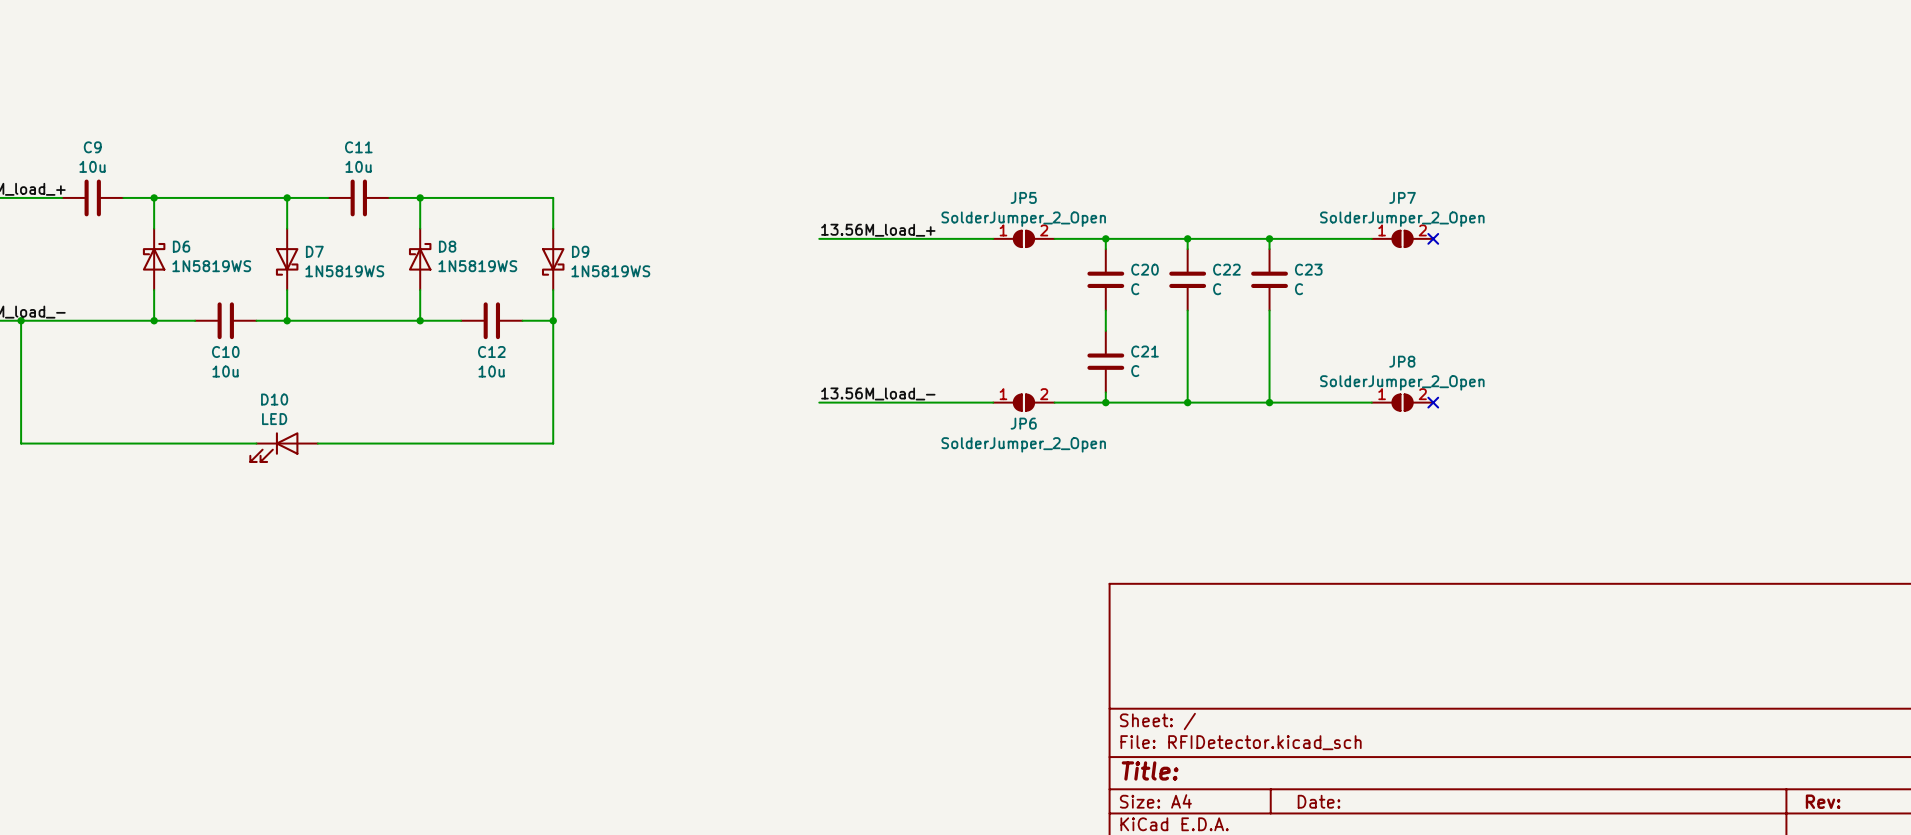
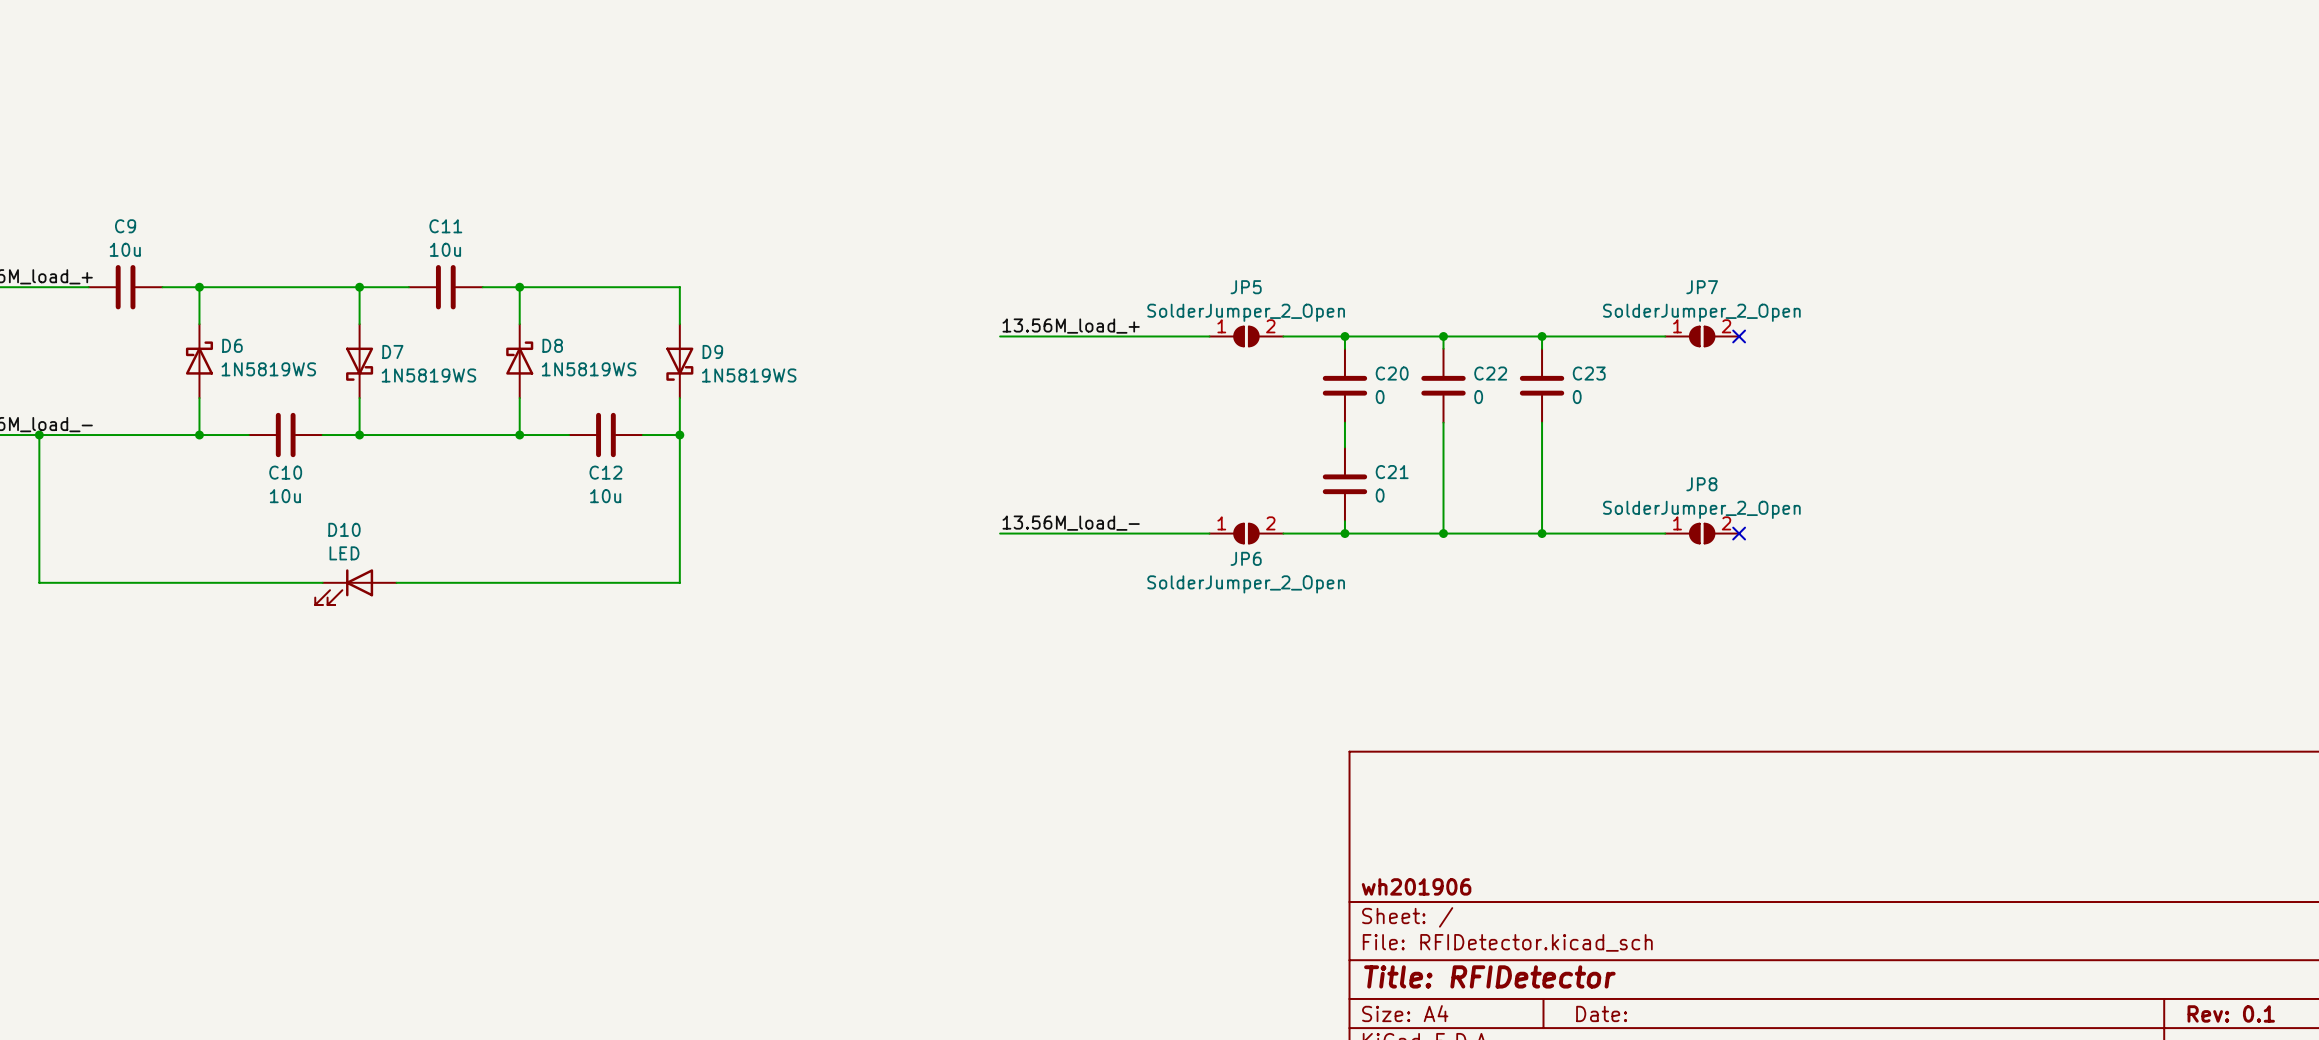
C20 value: C (1135, 289) -> 0 (1380, 397)
C22 value: C (1217, 289) -> 0 (1478, 397)
C23 value: C (1298, 289) -> 0 (1577, 397)
C21 value: C (1135, 371) -> 0 (1380, 495)
title block: none -> wh201906 (1416, 886)
title block: Title: (1150, 770) -> Title: RFIDetector (1489, 976)
title block: Rev: (1823, 801) -> Rev: 0.1 (2231, 1013)

